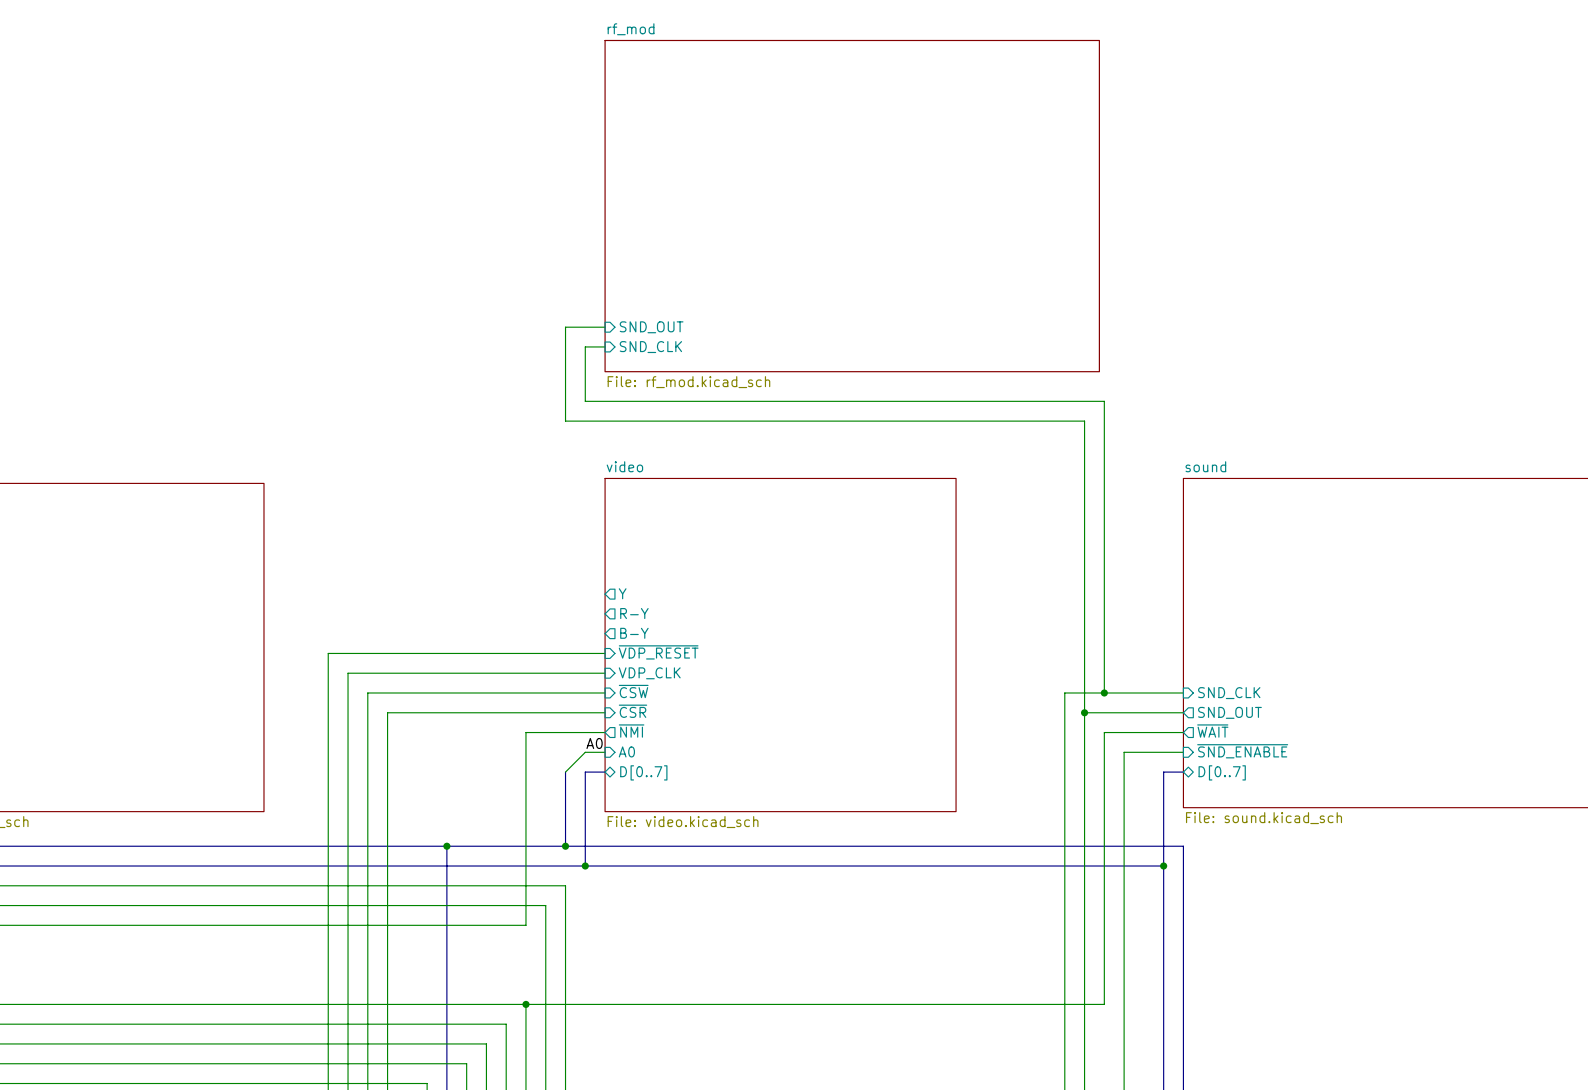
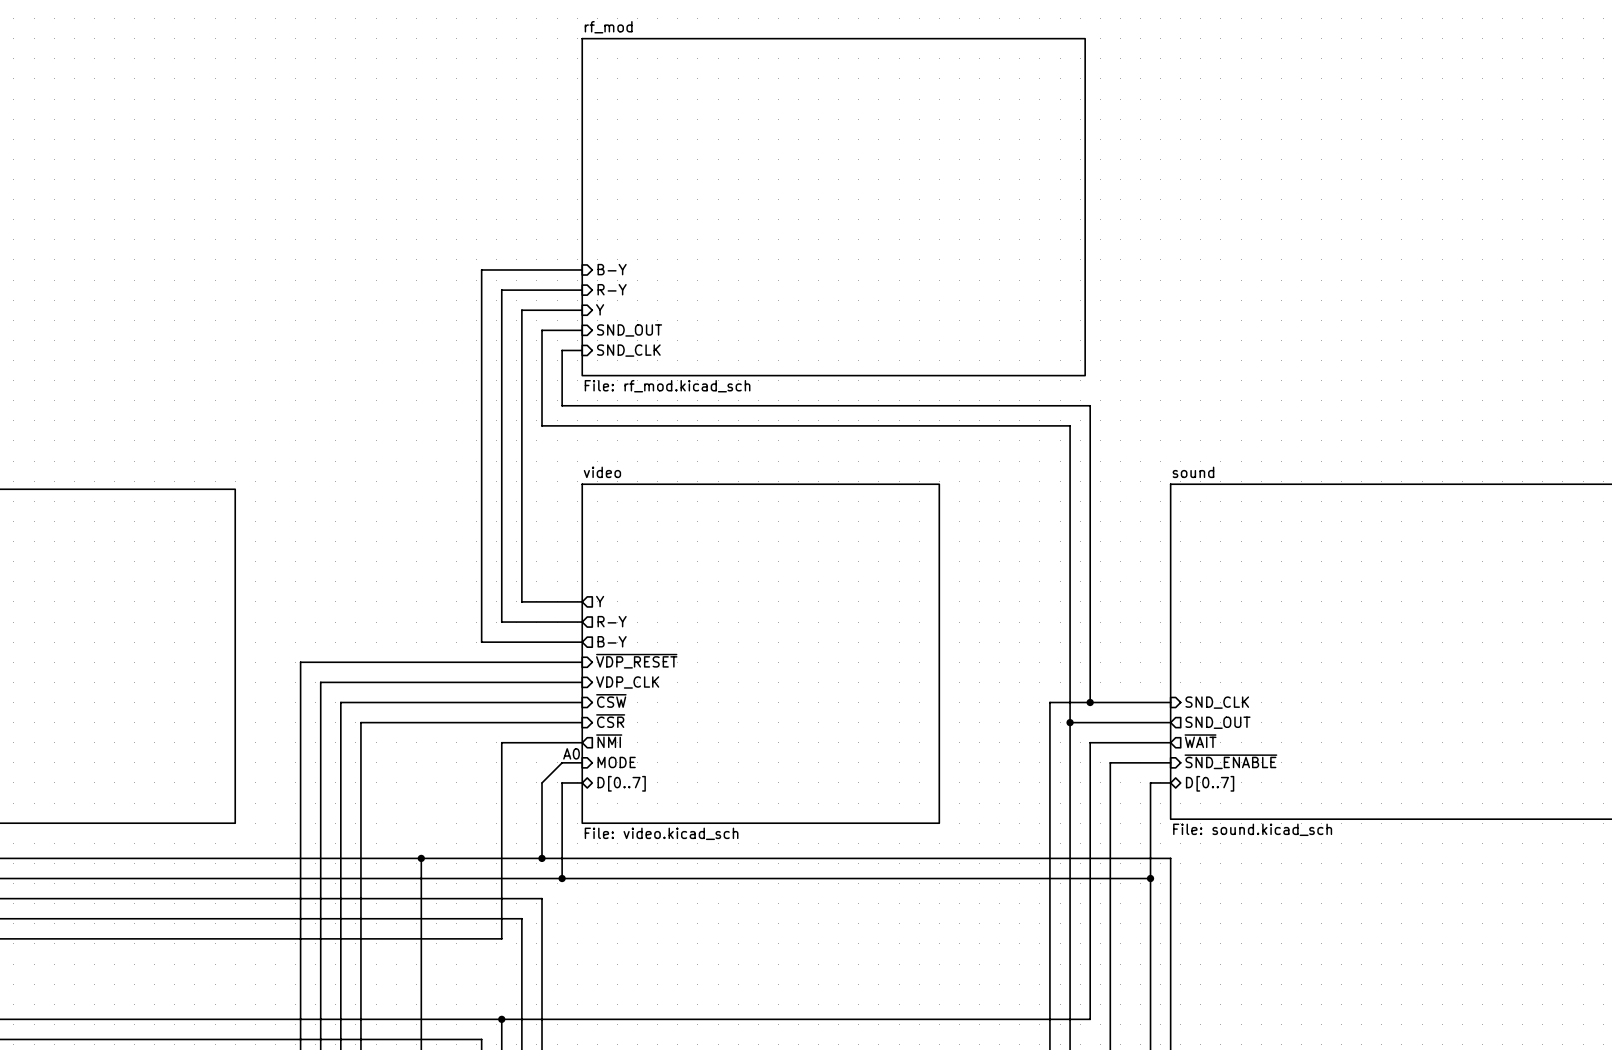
wire: none -> (582, 269) (481, 269) (481, 642) (582, 642)
sheet pin: none -> B-Y (612, 269)
wire: none -> (582, 290) (501, 290) (501, 622) (582, 622)
sheet pin: none -> R-Y (612, 289)
wire: none -> (582, 310) (521, 310) (521, 601) (582, 601)
sheet pin: none -> Y (600, 309)
sheet pin: A0 (626, 751) -> MODE (616, 762)

